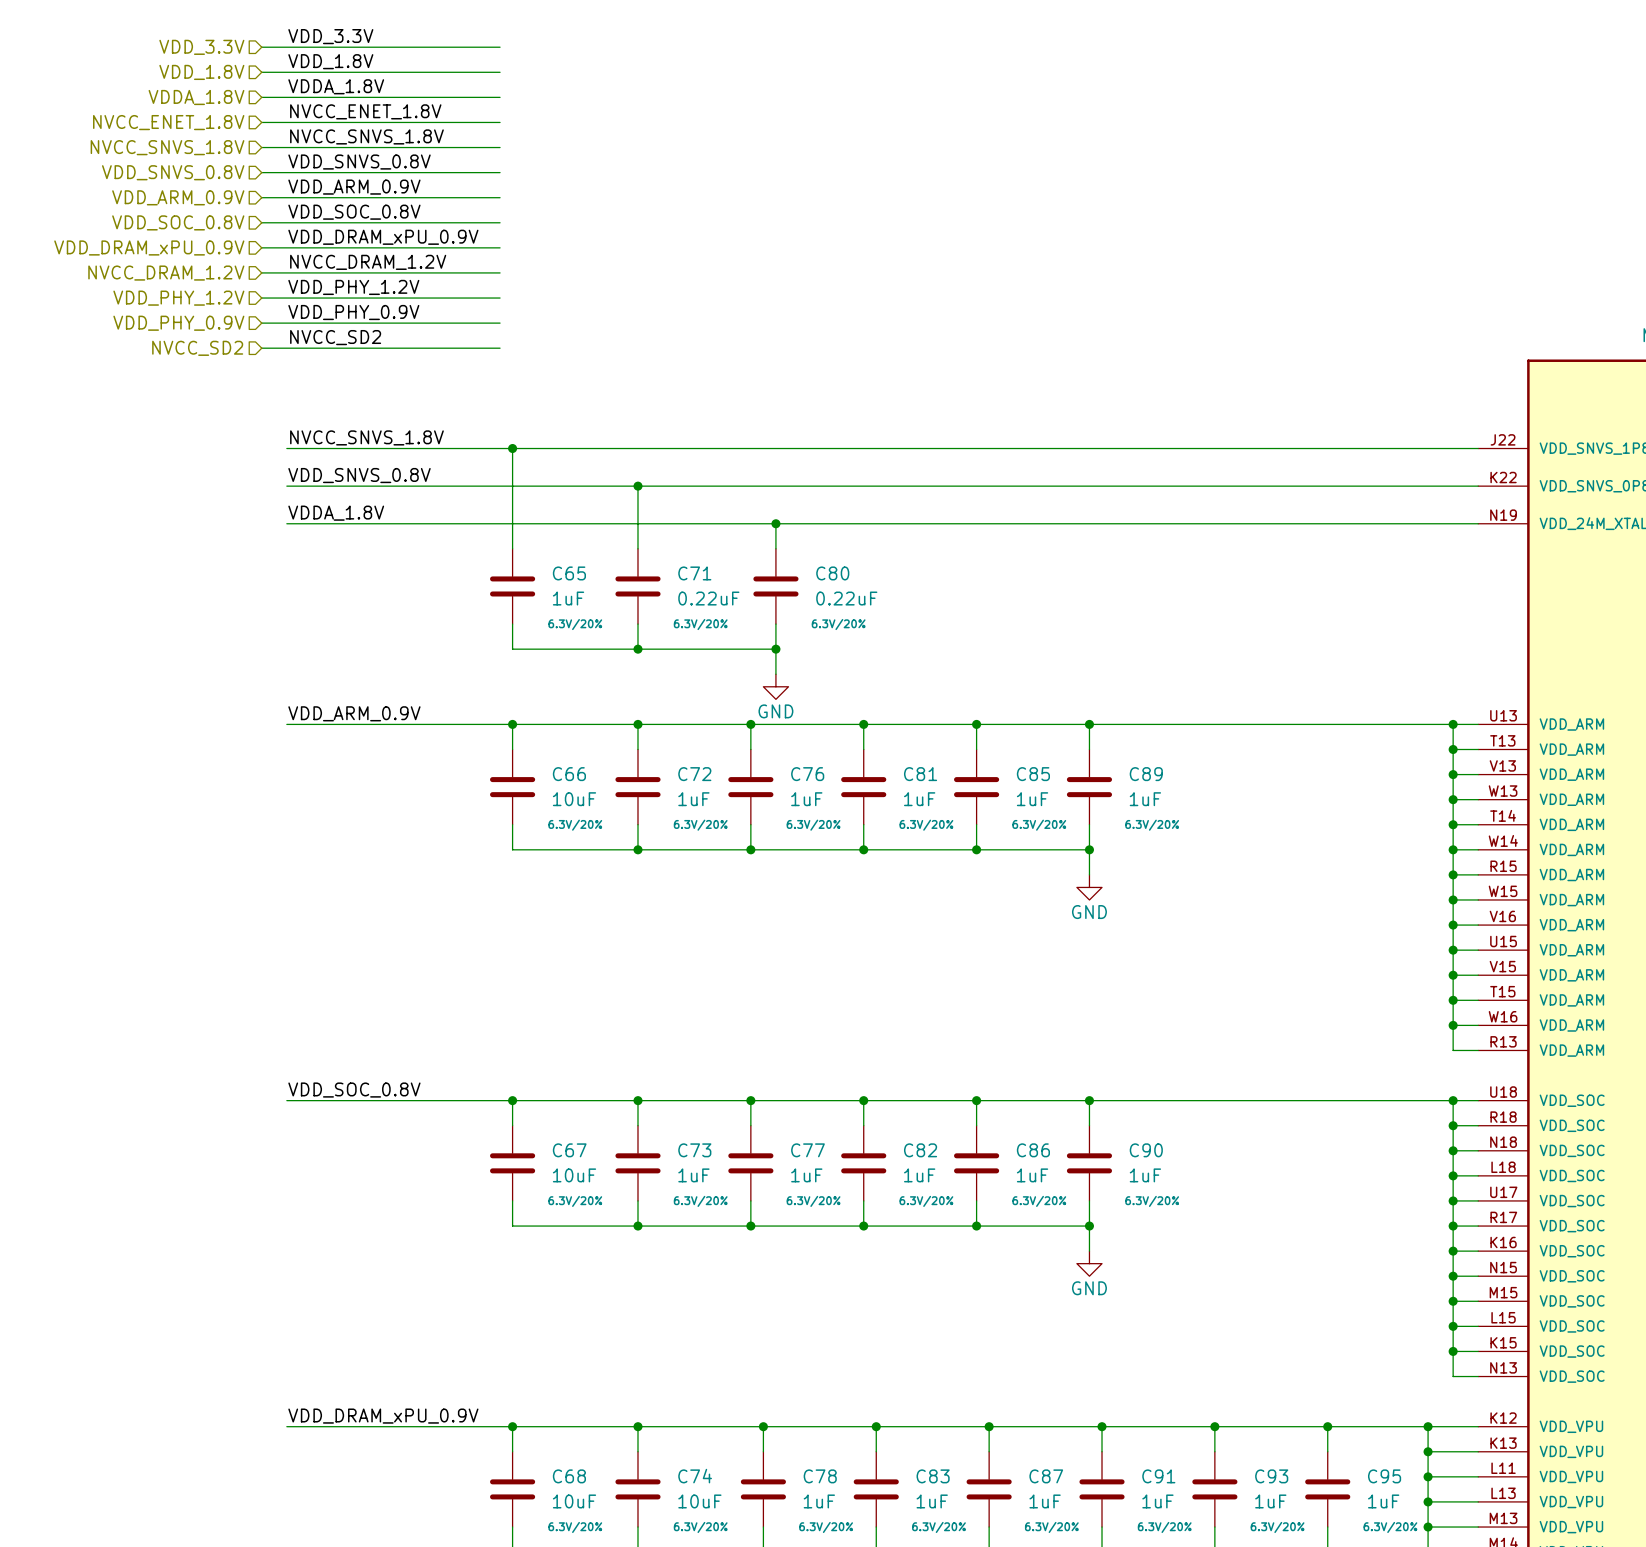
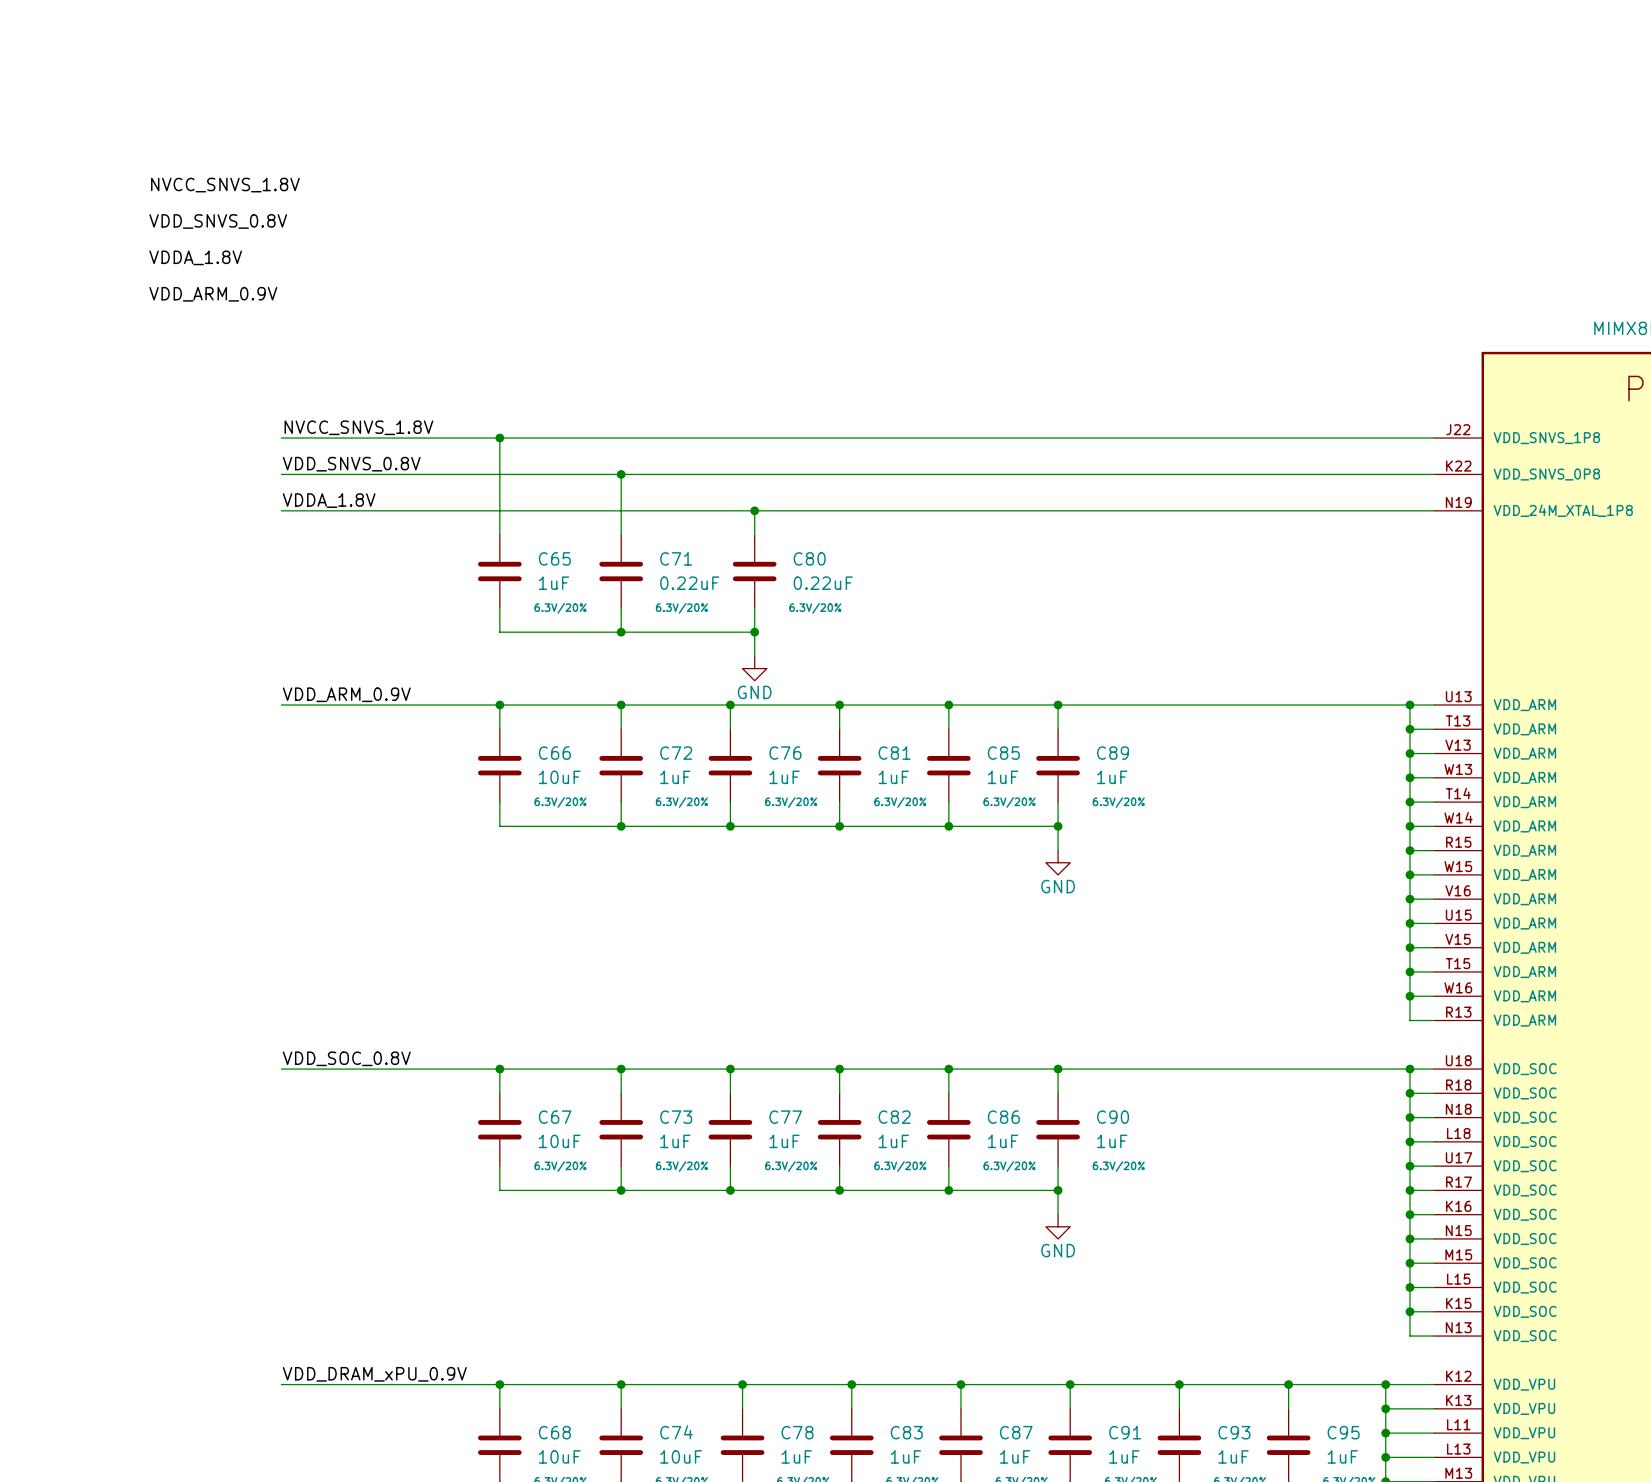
label: VDD_3.3V (330, 36) -> none
hierarchical label: VDD_3.3V (201, 47) -> none
wire: (261, 47) (500, 47) -> none
label: VDD_1.8V (330, 61) -> none
hierarchical label: VDD_1.8V (201, 72) -> none
wire: (261, 72) (500, 72) -> none
label position: VDDA_1.8V (336, 86) -> VDDA_1.8V (195, 257)
hierarchical label: VDDA_1.8V (196, 97) -> none
wire: (261, 97) (500, 97) -> none
label: NVCC_ENET_1.8V (365, 111) -> none
hierarchical label: NVCC_ENET_1.8V (168, 122) -> none
wire: (261, 122) (500, 122) -> none
label position: NVCC_SNVS_1.8V (366, 136) -> NVCC_SNVS_1.8V (225, 185)
hierarchical label: NVCC_SNVS_1.8V (167, 147) -> none
wire: (261, 147) (500, 147) -> none
label position: VDD_SNVS_0.8V (359, 162) -> VDD_SNVS_0.8V (218, 221)
hierarchical label: VDD_SNVS_0.8V (173, 172) -> none
wire: (261, 172) (500, 172) -> none
label position: VDD_ARM_0.9V (354, 187) -> VDD_ARM_0.9V (213, 294)
hierarchical label: VDD_ARM_0.9V (178, 197) -> none
wire: (261, 197) (500, 197) -> none
label: VDD_SOC_0.8V (354, 212) -> none
hierarchical label: VDD_SOC_0.8V (178, 222) -> none
wire: (261, 222) (500, 222) -> none
label: VDD_DRAM_xPU_0.9V (383, 237) -> none
hierarchical label: VDD_DRAM_xPU_0.9V (149, 247) -> none
wire: (261, 247) (500, 247) -> none
label: NVCC_DRAM_1.2V (368, 262) -> none
wire: (261, 272) (500, 272) -> none
hierarchical label: NVCC_DRAM_1.2V (166, 273) -> none
label: VDD_PHY_1.2V (353, 287) -> none
hierarchical label: VDD_PHY_1.2V (178, 298) -> none
wire: (261, 298) (500, 298) -> none
label: VDD_PHY_0.9V (353, 312) -> none
hierarchical label: VDD_PHY_0.9V (178, 323) -> none
wire: (261, 323) (500, 323) -> none
label: NVCC_SD2 (335, 337) -> none
hierarchical label: NVCC_SD2 (197, 348) -> none
wire: (261, 348) (500, 348) -> none

